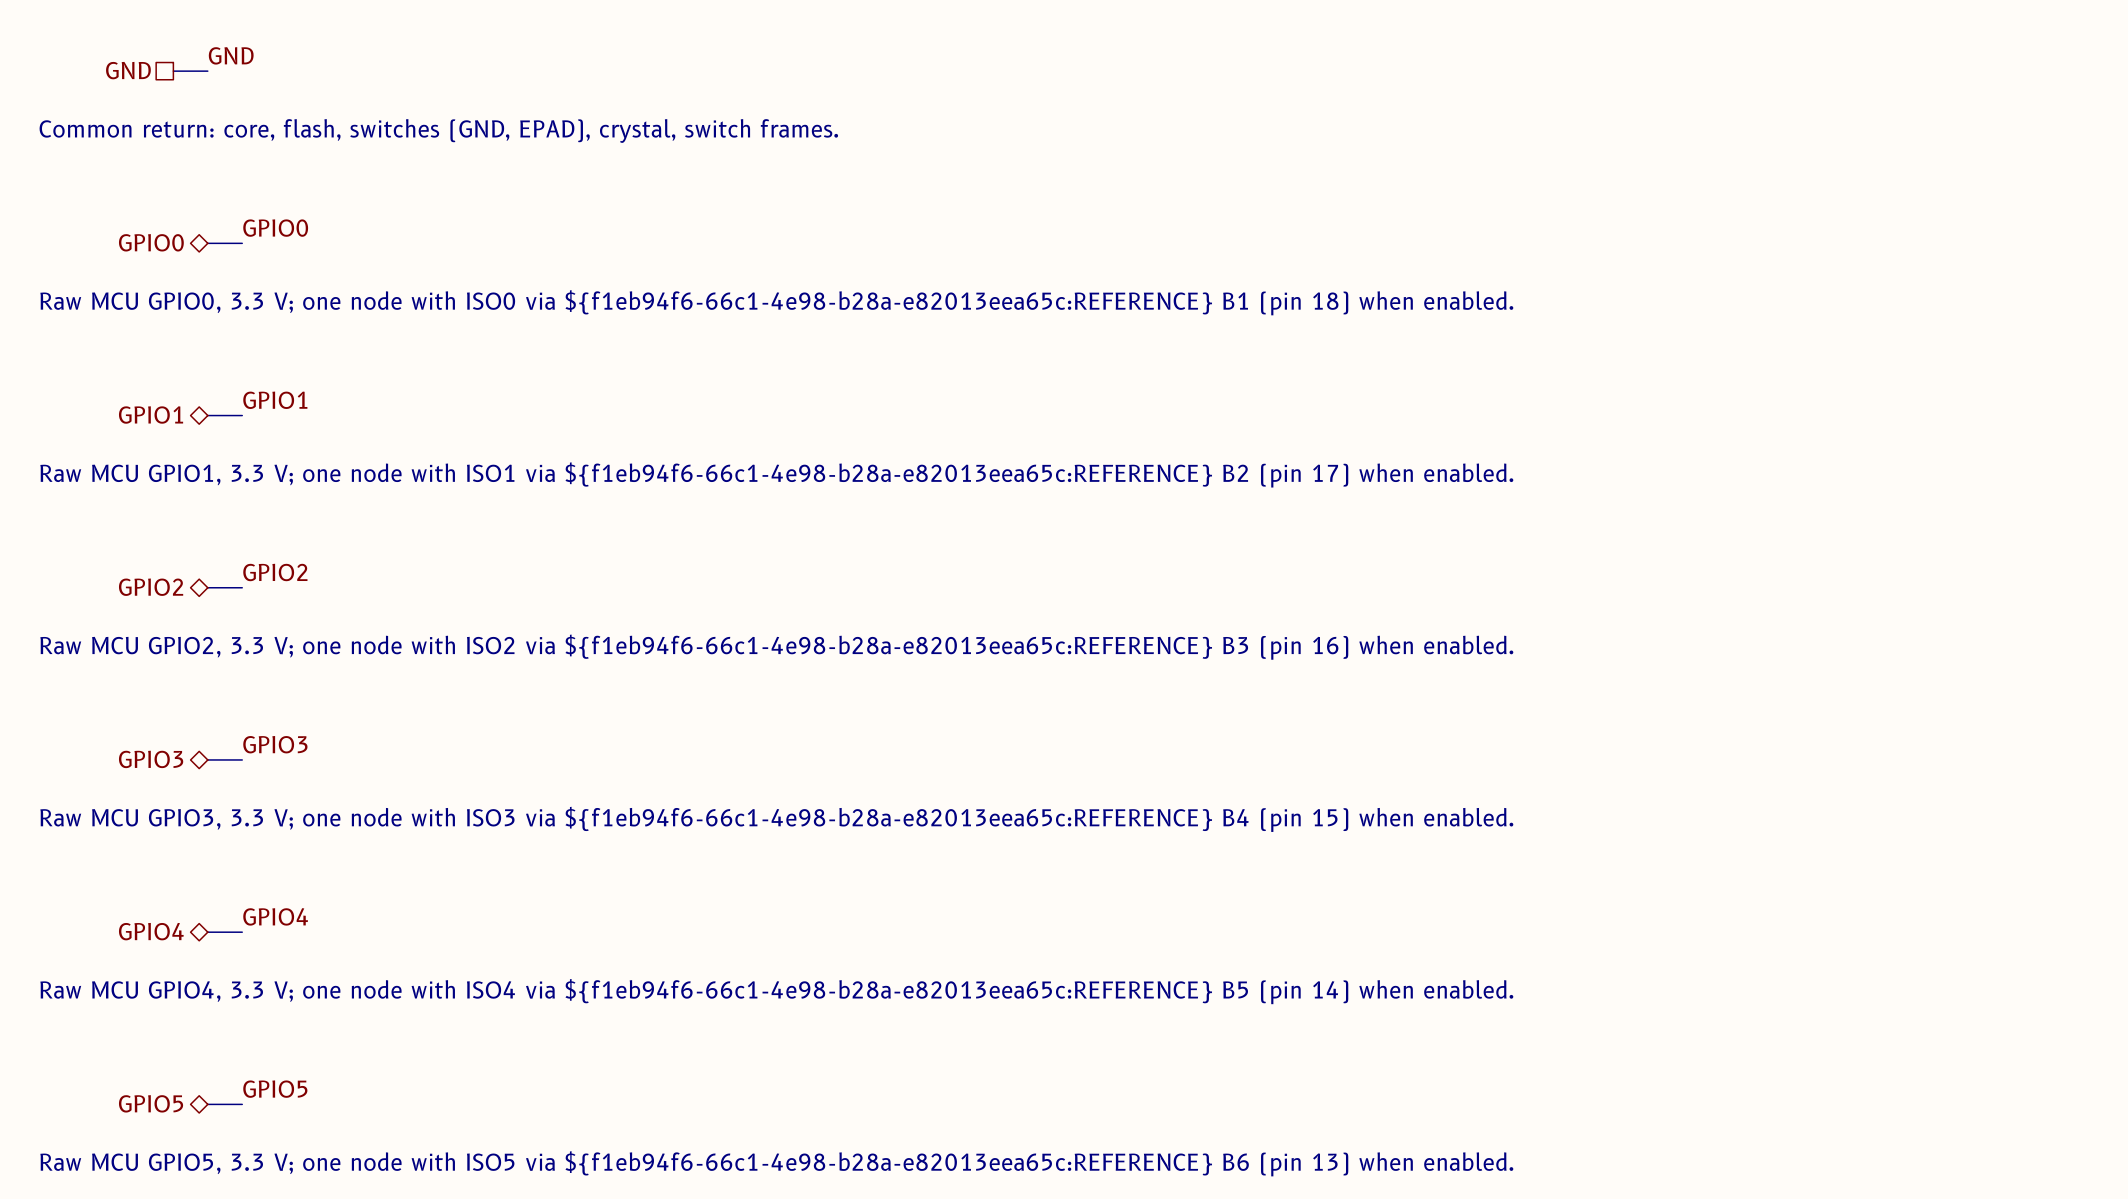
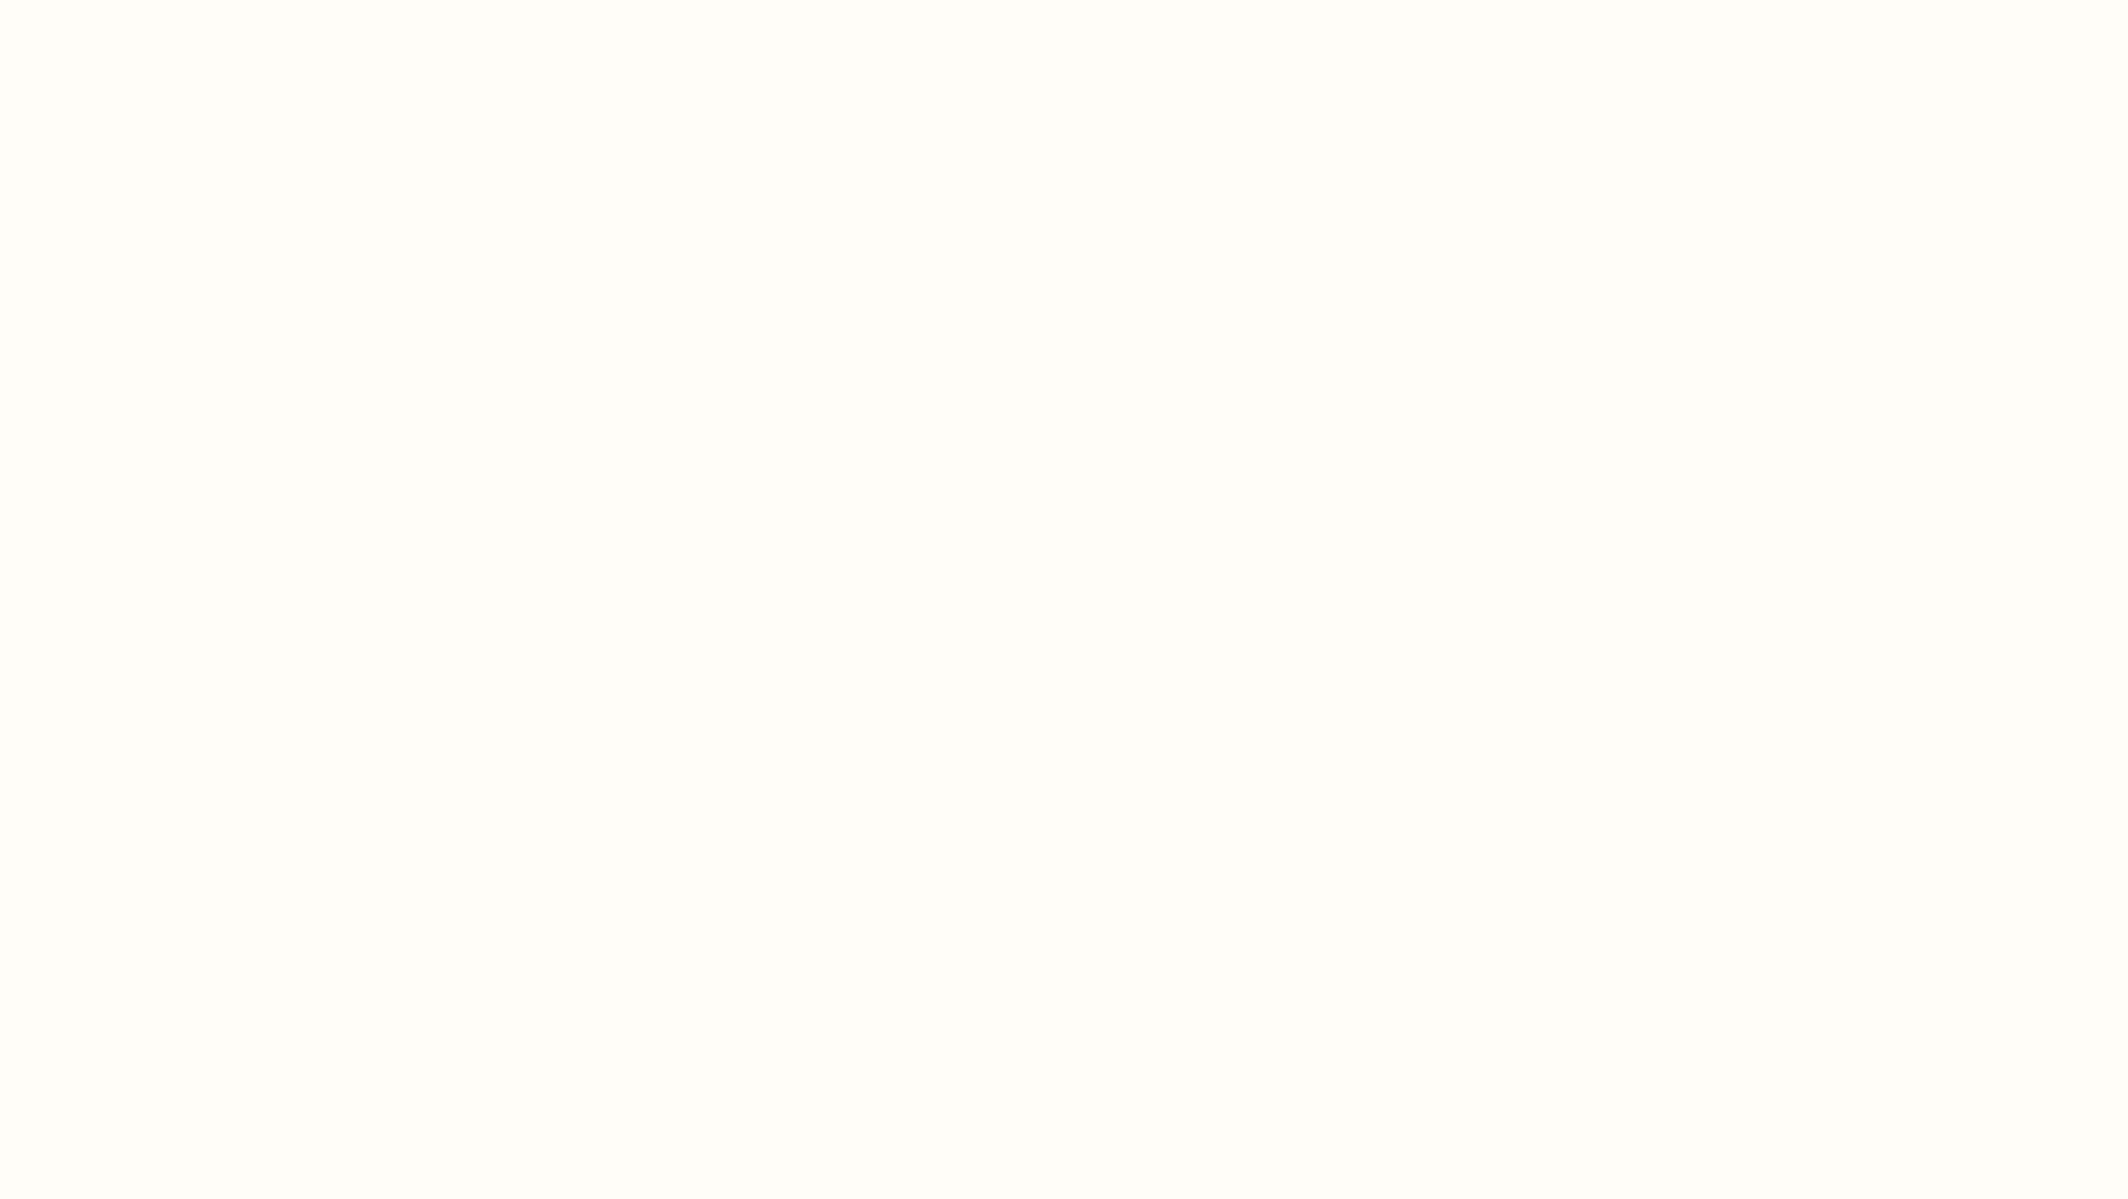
label: GND (231, 55) -> none
hierarchical label: GND (128, 70) -> none
wire: (173, 71) (207, 71) -> none
text: Common return: core, flash, switches (GND, EPAD), crystal, switch frames. (438, 130) -> none
label: GPIO0 (275, 228) -> none
hierarchical label: GPIO0 (151, 242) -> none
wire: (207, 243) (242, 243) -> none
text: Raw MCU GPIO0, 3.3 V; one node with ISO0 via ${f1eb94f6-66c1-4e98-b28a-e82013eea65c:REFERENCE} B1 (pin 18) when enabled. (776, 302) -> none
label: GPIO1 (275, 400) -> none
hierarchical label: GPIO1 (151, 415) -> none
wire: (207, 415) (242, 415) -> none
text: Raw MCU GPIO1, 3.3 V; one node with ISO1 via ${f1eb94f6-66c1-4e98-b28a-e82013eea65c:REFERENCE} B2 (pin 17) when enabled. (776, 474) -> none
label: GPIO2 (275, 572) -> none
hierarchical label: GPIO2 (151, 587) -> none
wire: (207, 587) (242, 587) -> none
text: Raw MCU GPIO2, 3.3 V; one node with ISO2 via ${f1eb94f6-66c1-4e98-b28a-e82013eea65c:REFERENCE} B3 (pin 16) when enabled. (776, 647) -> none
label: GPIO3 (275, 744) -> none
hierarchical label: GPIO3 (151, 759) -> none
wire: (207, 759) (242, 759) -> none
text: Raw MCU GPIO3, 3.3 V; one node with ISO3 via ${f1eb94f6-66c1-4e98-b28a-e82013eea65c:REFERENCE} B4 (pin 15) when enabled. (776, 819) -> none
label: GPIO4 (275, 916) -> none
hierarchical label: GPIO4 (151, 931) -> none
wire: (207, 932) (242, 932) -> none
text: Raw MCU GPIO4, 3.3 V; one node with ISO4 via ${f1eb94f6-66c1-4e98-b28a-e82013eea65c:REFERENCE} B5 (pin 14) when enabled. (776, 991) -> none
label: GPIO5 (275, 1089) -> none
hierarchical label: GPIO5 (151, 1103) -> none
wire: (207, 1104) (242, 1104) -> none
text: Raw MCU GPIO5, 3.3 V; one node with ISO5 via ${f1eb94f6-66c1-4e98-b28a-e82013eea65c:REFERENCE} B6 (pin 13) when enabled. (776, 1163) -> none

